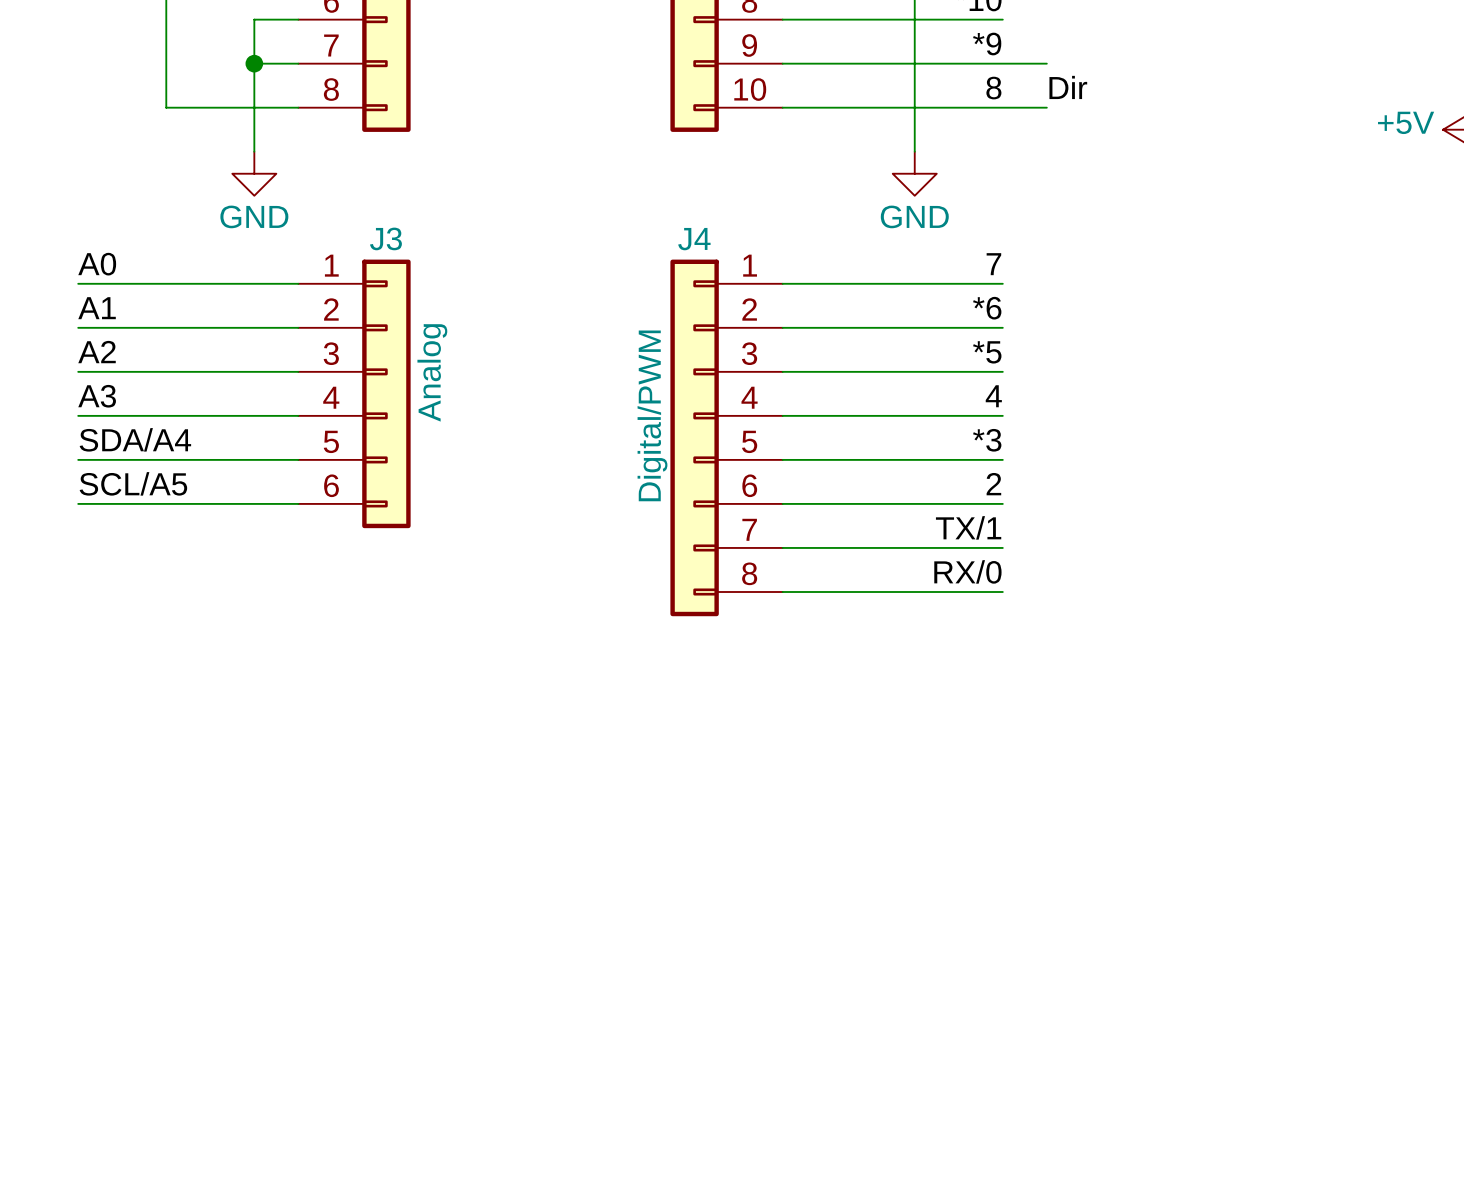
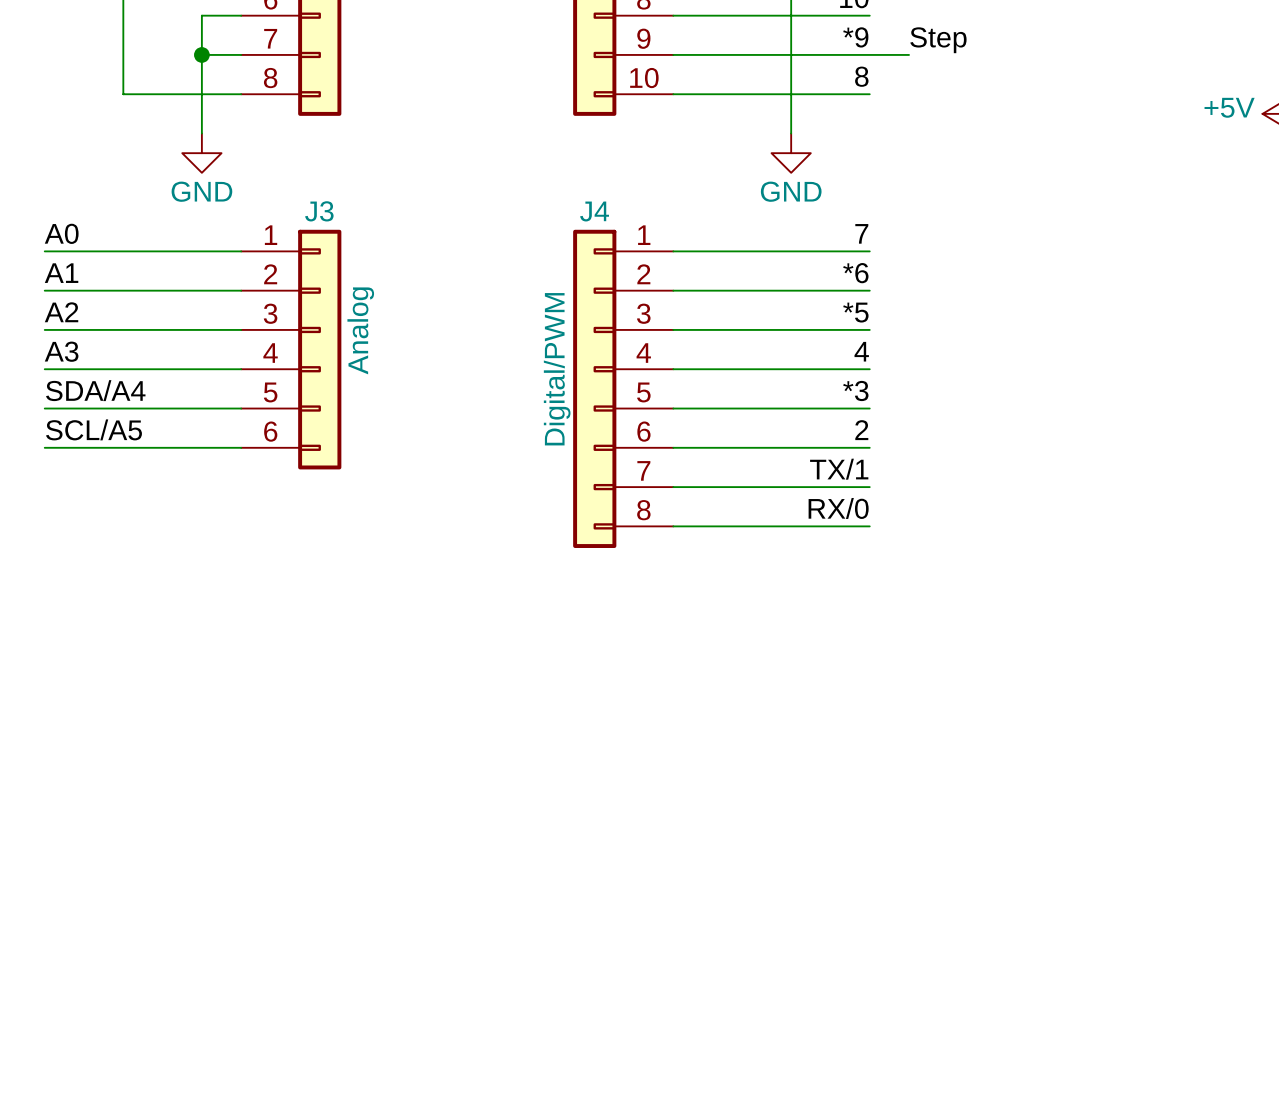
label: none -> Step (938, 40)
label: Dir (1068, 87) -> none
wire: (1002, 107) (1046, 107) -> none

